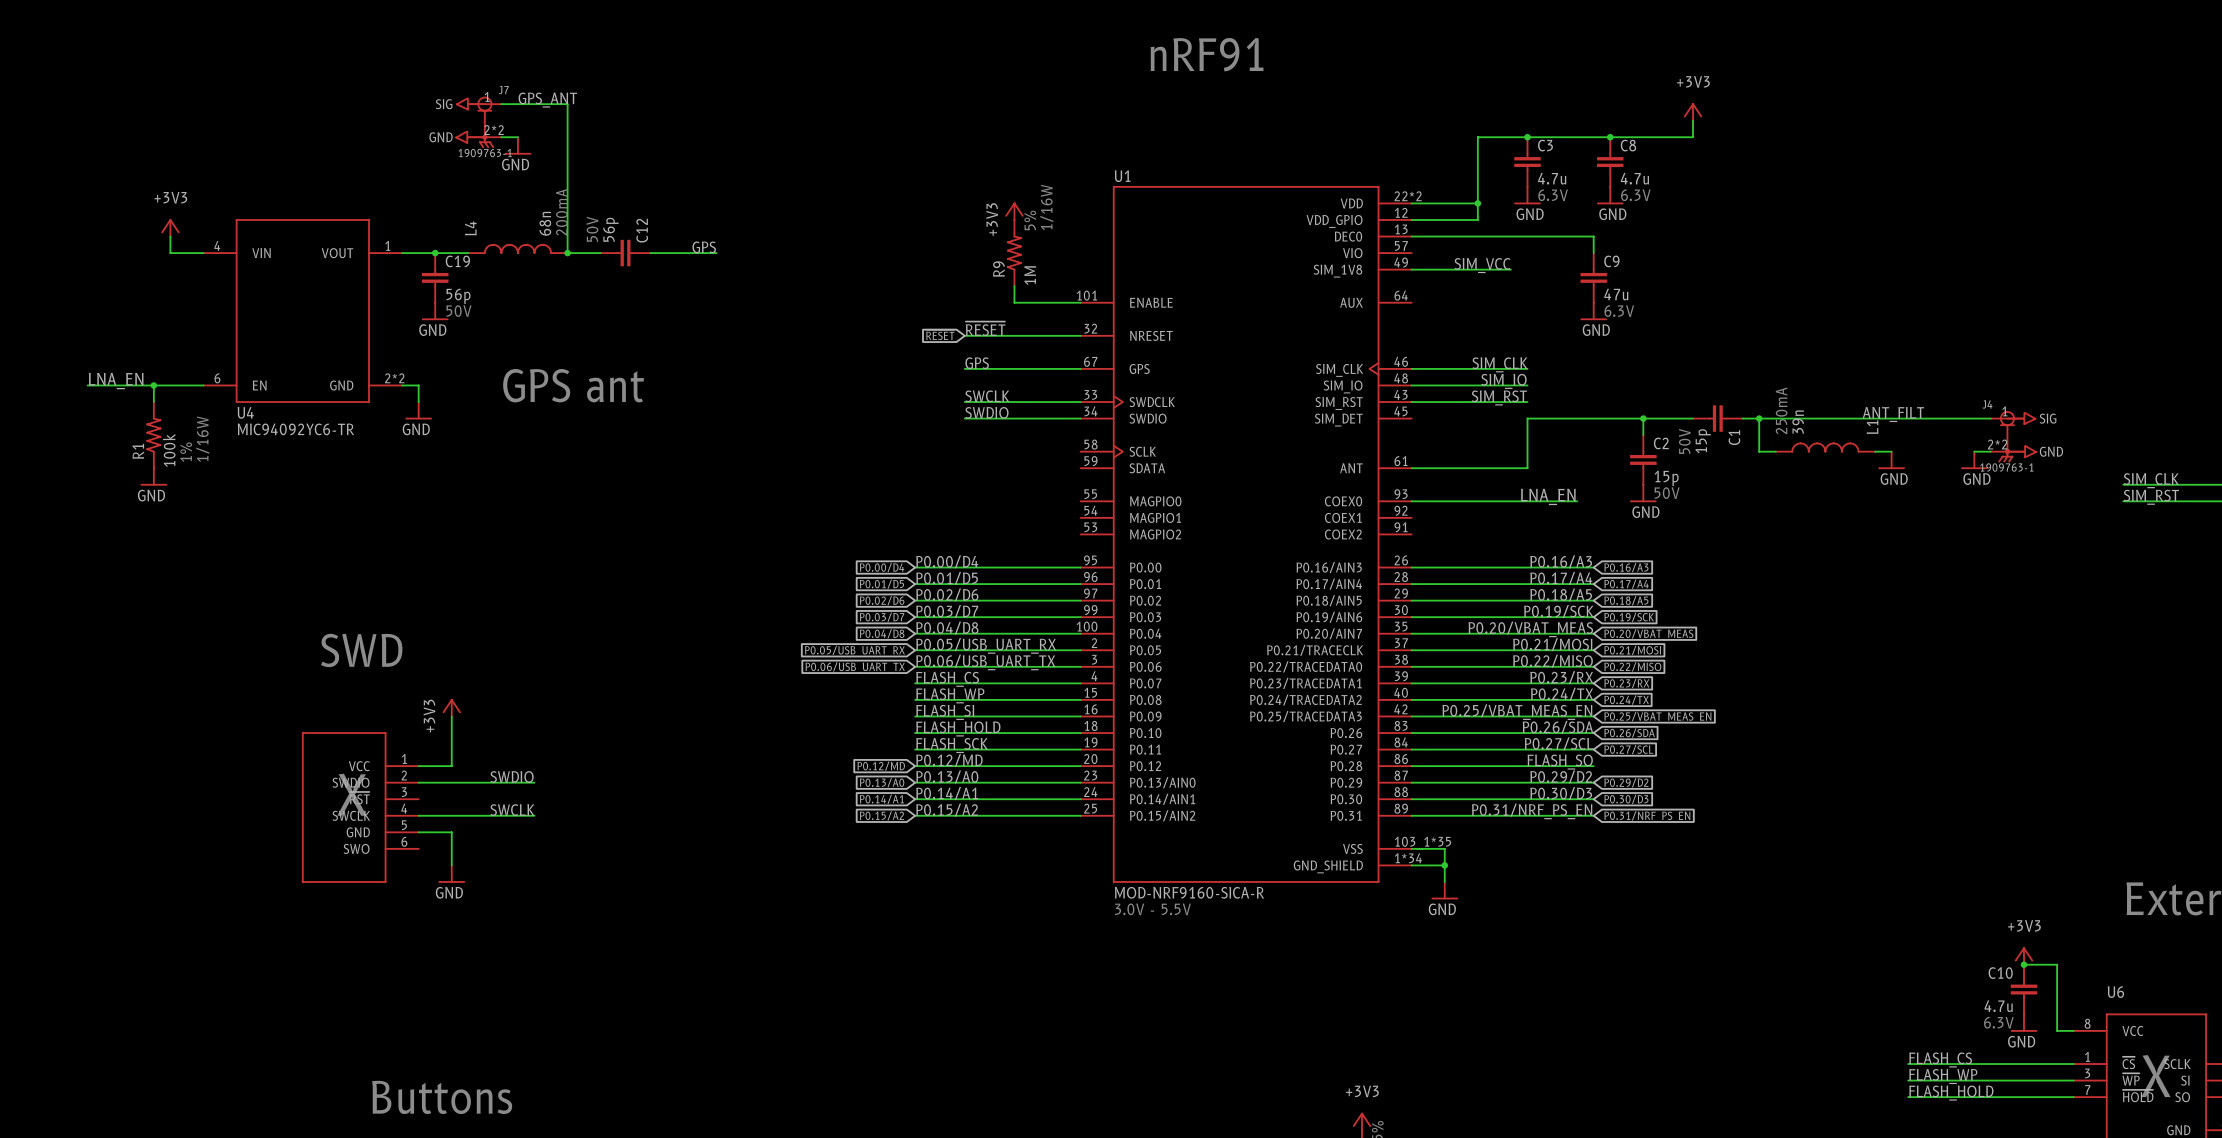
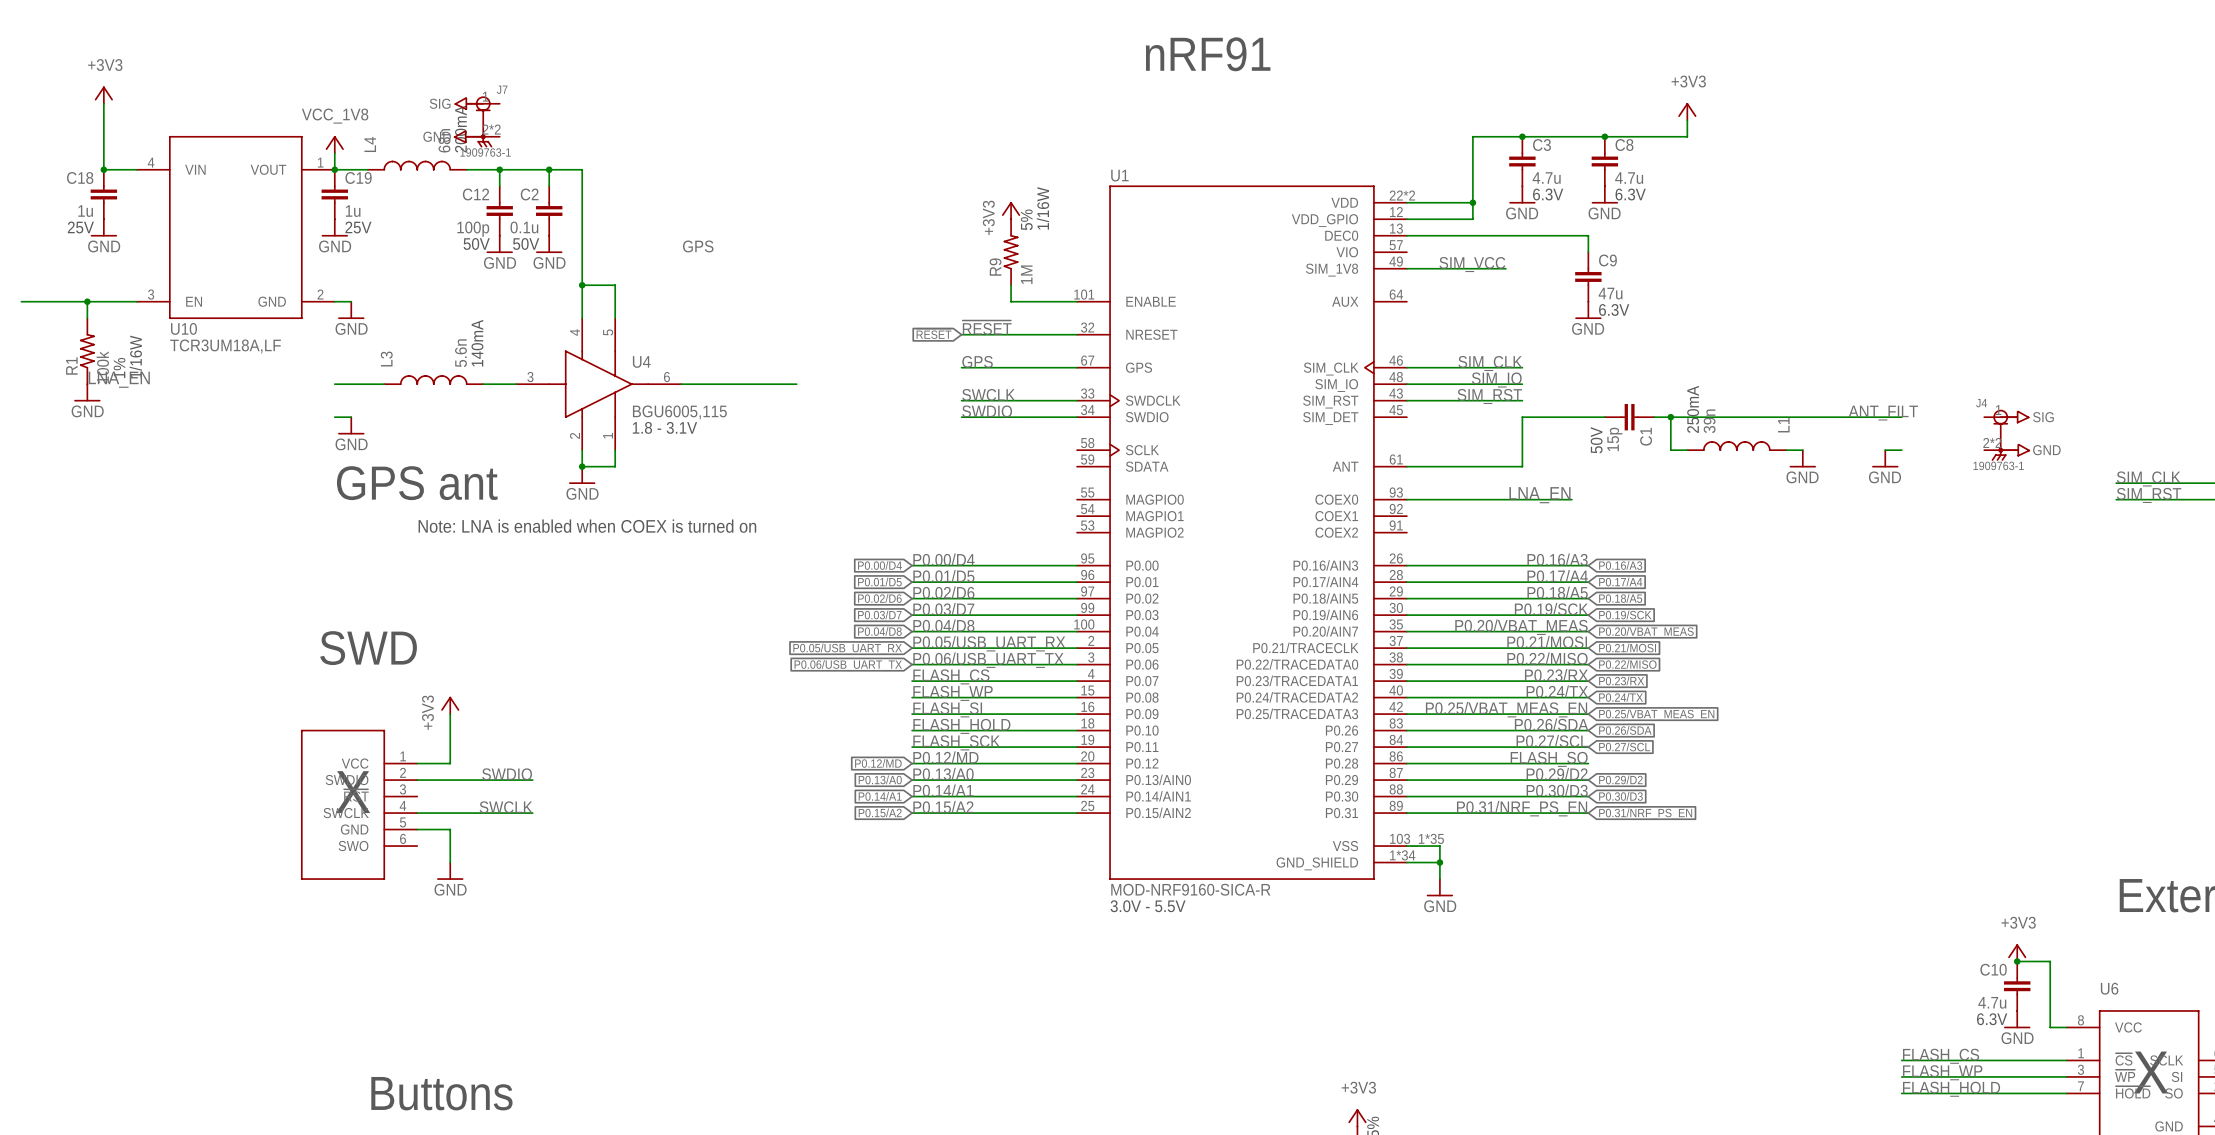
label: GPS_ANT (547, 100) -> none
wire: none -> (103, 103) (103, 169) (136, 169)
wire: (501, 104) (567, 104) (567, 253) (600, 253) -> none
wire: (501, 137) (517, 137) -> none
power symbol: none -> VCC_1V8 (334, 144)
power symbol: GND (517, 145) -> none
wire: none -> (334, 153) (334, 169) (367, 169)
junction: none -> (103, 169)
junction: none -> (334, 169)
wire: none -> (466, 169) (582, 169) (582, 318)
wire: none -> (499, 169) (499, 186)
junction: none -> (499, 169)
wire: none -> (549, 169) (549, 186)
junction: none -> (549, 169)
C18: none -> 1u (103, 194)
U4 symbol: [203, 219, 403, 403] -> [516, 318, 682, 451]
power symbol position: +3V3 (170, 227) -> +3V3 (103, 95)
power symbol: none -> GND (103, 227)
U10: none -> (235, 227)
power symbol: none -> GND (334, 227)
C12 text position: 50V (592, 229) -> 50V (476, 243)
C12 value: 56p (610, 229) -> 100p (473, 229)
C12 name position: C12 (642, 230) -> C12 (475, 194)
wire: (170, 236) (170, 253) (203, 253) -> none
power symbol: none -> GND (499, 244)
power symbol: none -> GND (549, 244)
L4 position: (517, 248) -> (417, 165)
wire: (402, 253) (468, 253) -> none
junction: (435, 253) -> none
junction position: (567, 253) -> (582, 285)
C12 rotation: 0° (625, 253) -> 90° clockwise (499, 210)
C12 position: (625, 253) -> (499, 210)
wire: (650, 253) (716, 253) -> none
C19 position: (435, 277) -> (334, 194)
wire: none -> (582, 285) (615, 285) (615, 318)
C19 value: 56p (458, 296) -> 1u (353, 211)
junction: none -> (87, 301)
wire: none -> (334, 301) (351, 301)
power symbol: none -> GND (351, 310)
power symbol: GND (435, 311) -> none
C19 text: 50V (458, 311) -> 25V (358, 227)
L3: none -> 5.6n (433, 380)
wire: (87, 385) (203, 385) -> (21, 301) (136, 301)
wire: (153, 385) (153, 402) -> (87, 301) (87, 318)
junction: (153, 385) -> none
wire: none -> (334, 384) (384, 384)
wire: (402, 385) (418, 385) (418, 402) -> none
wire: none -> (483, 384) (516, 384)
text: GPS ant (573, 385) -> none
wire: none -> (681, 384) (796, 384)
power symbol: none -> GND (87, 392)
power symbol: GND (418, 410) -> none
U4 name position: U4 (245, 412) -> U4 (641, 361)
U4 value: none -> BGU6005,115 (679, 412)
wire: none -> (334, 417) (351, 417)
wire: (1643, 418) (1643, 435) -> none
junction position: (1643, 418) -> (1670, 417)
C1 position: (1717, 418) -> (1629, 417)
wire: (1759, 418) (1759, 451) (1775, 451) -> (1670, 417) (1670, 450) (1687, 450)
junction: (1759, 418) -> none
wire: (1908, 418) (1990, 418) -> none
power symbol: none -> GND (351, 425)
U4 text: MIC94092YC6-TR (295, 429) -> none
text: none -> 1.8 - 3.1V (664, 427)
R1 position: (153, 435) -> (87, 351)
C2 name position: C2 (1661, 443) -> C2 (529, 194)
L1 position: (1825, 447) -> (1736, 446)
wire: none -> (582, 450) (582, 466) (615, 466) (615, 450)
wire: none -> (1786, 450) (1802, 450)
wire: (1875, 451) (1891, 451) -> (1901, 450) (1885, 450)
wire: (1974, 451) (1990, 451) -> none
C2 position: (1643, 459) -> (549, 210)
power symbol: none -> GND (1802, 458)
power symbol: GND (1974, 460) -> none
junction: none -> (582, 466)
power symbol: GND (153, 476) -> none
power symbol: none -> GND (582, 475)
C2 value: 15p (1666, 478) -> 0.1u (524, 227)
text: none -> GPS ant (417, 483)
power symbol: GND (1643, 493) -> none
C2 text position: 50V (1667, 493) -> 50V (526, 243)
text: none -> Note: LNA is enabled when COEX is turned on (587, 526)

